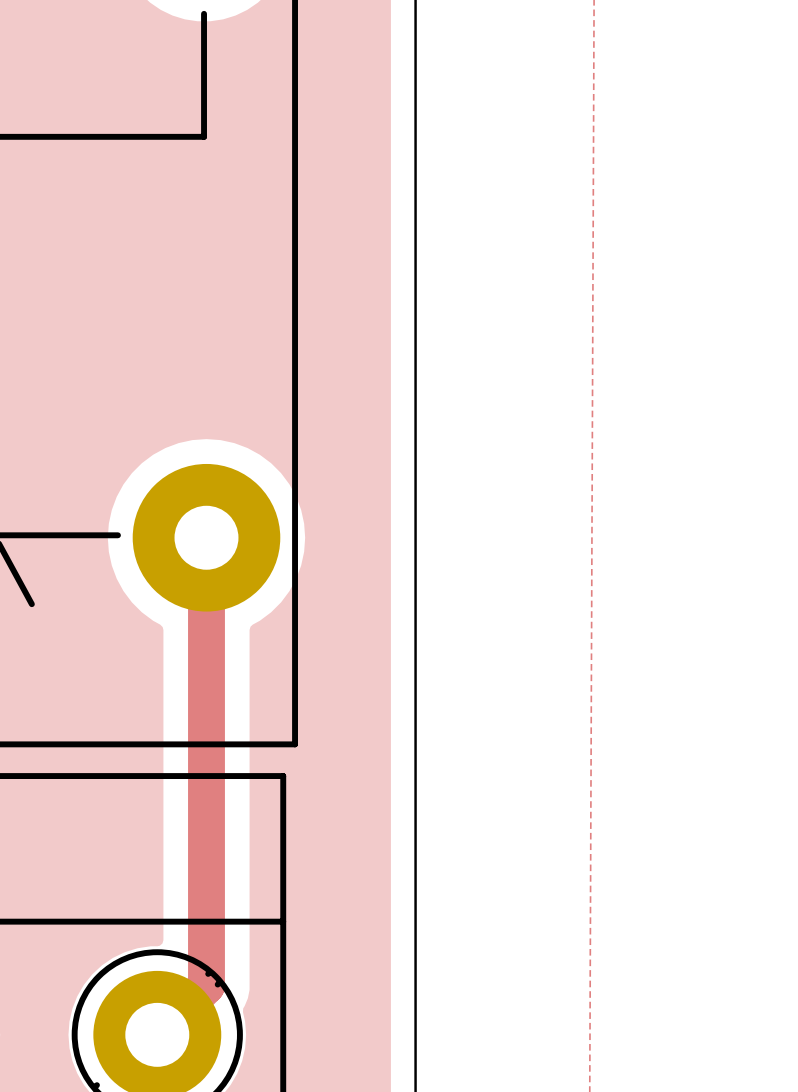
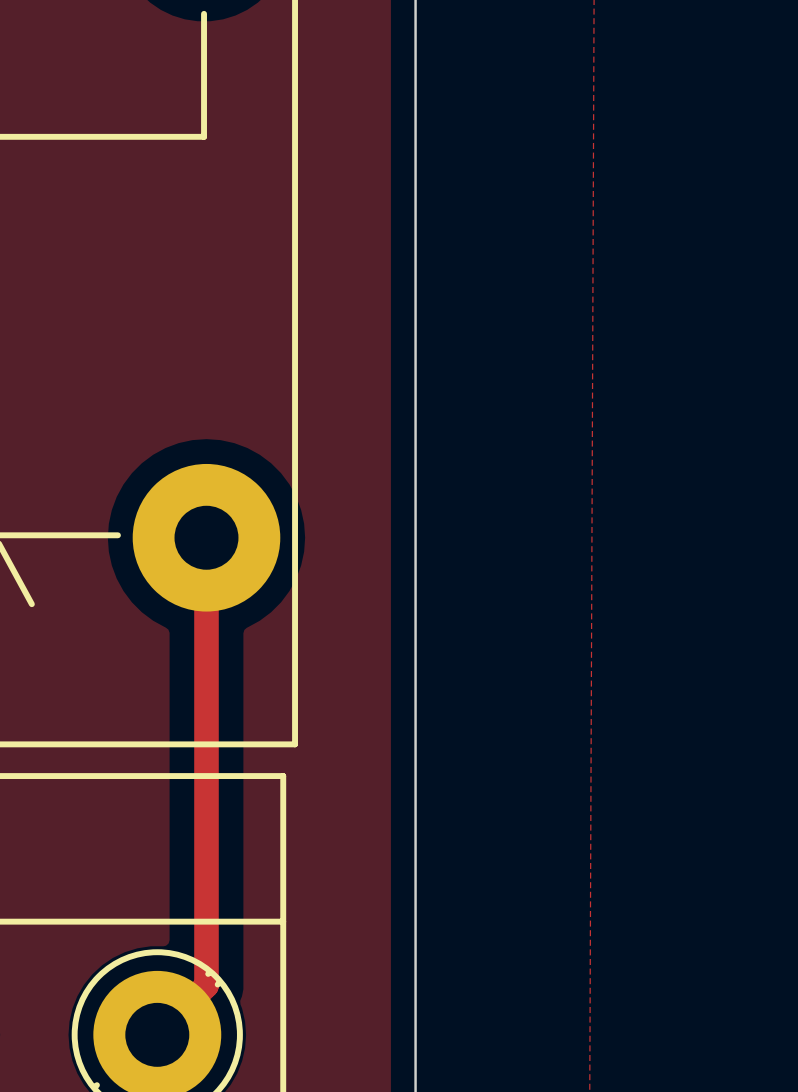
track width: thick (206, 537) (206, 985) (157, 1034) -> thin (206, 537) (206, 985) (157, 1034)

